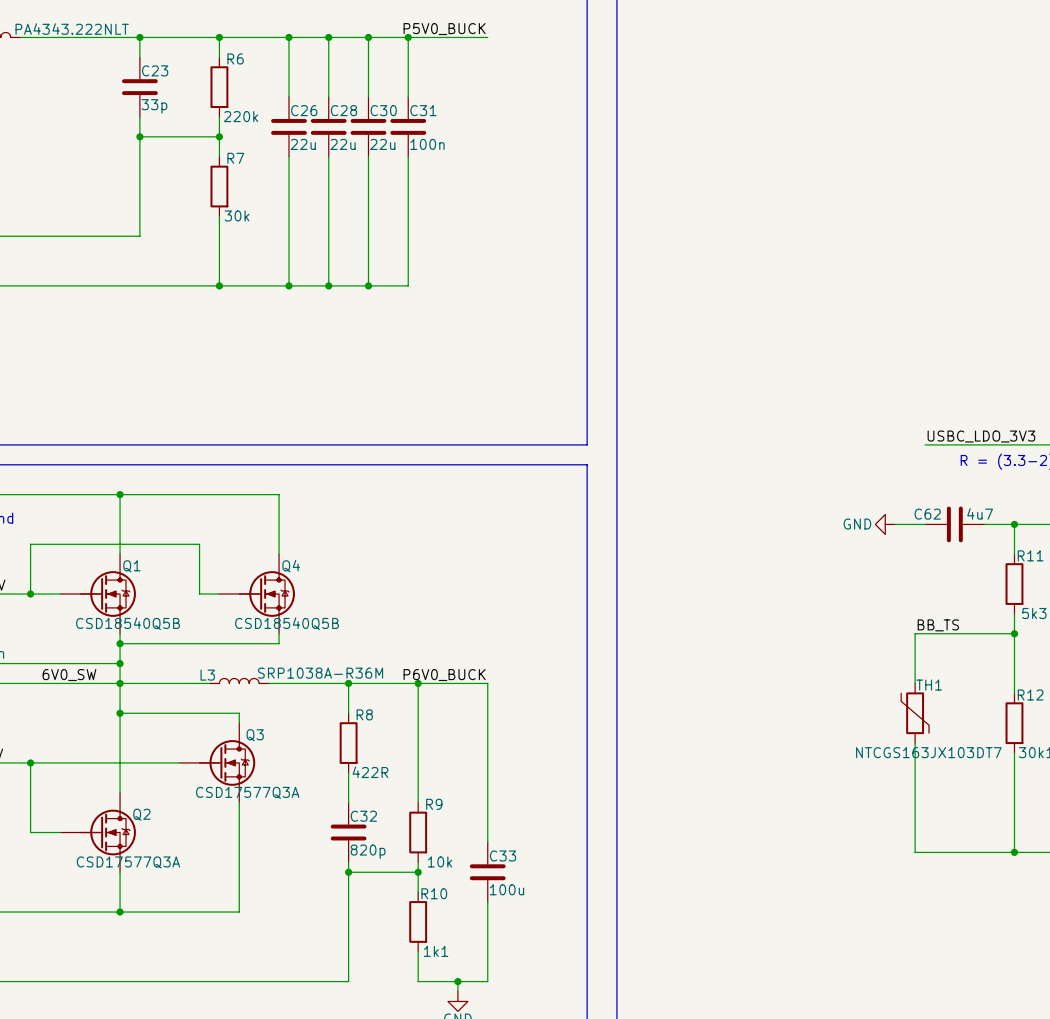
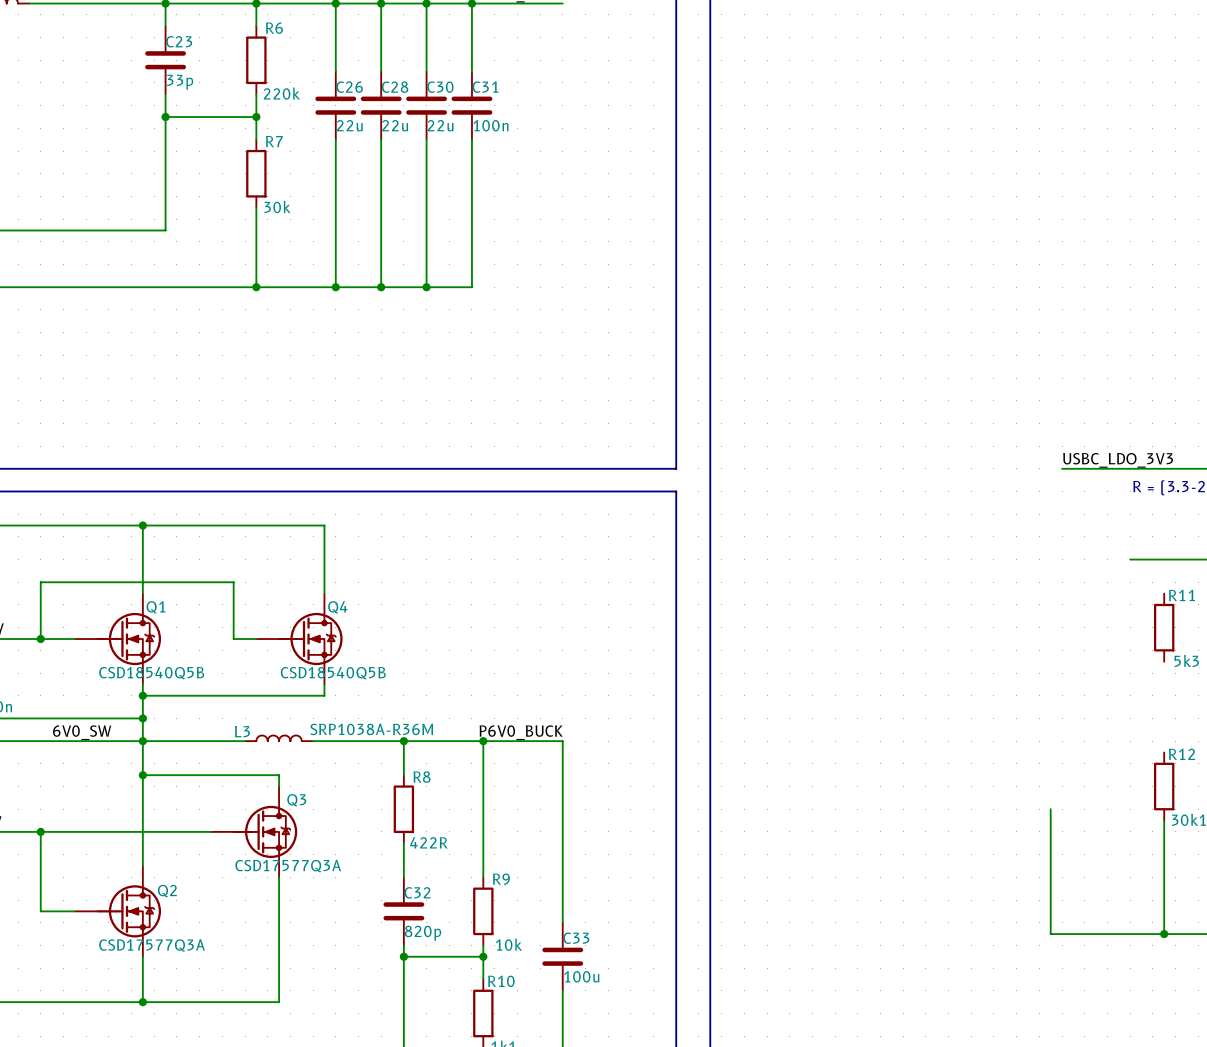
power symbol: GND (885, 524) -> none
wire: (895, 524) (925, 524) -> none
C62: 4u7 (954, 524) -> none
wire: (1014, 524) (1014, 554) -> none
junction: (1014, 524) -> none
wire: (1014, 613) (1014, 693) -> none
label: BB_TS (938, 625) -> none
wire: (1014, 633) (915, 633) (915, 683) -> none
junction: (1014, 633) -> none
TH1: NTCGS163JX103DT7 (915, 713) -> none

